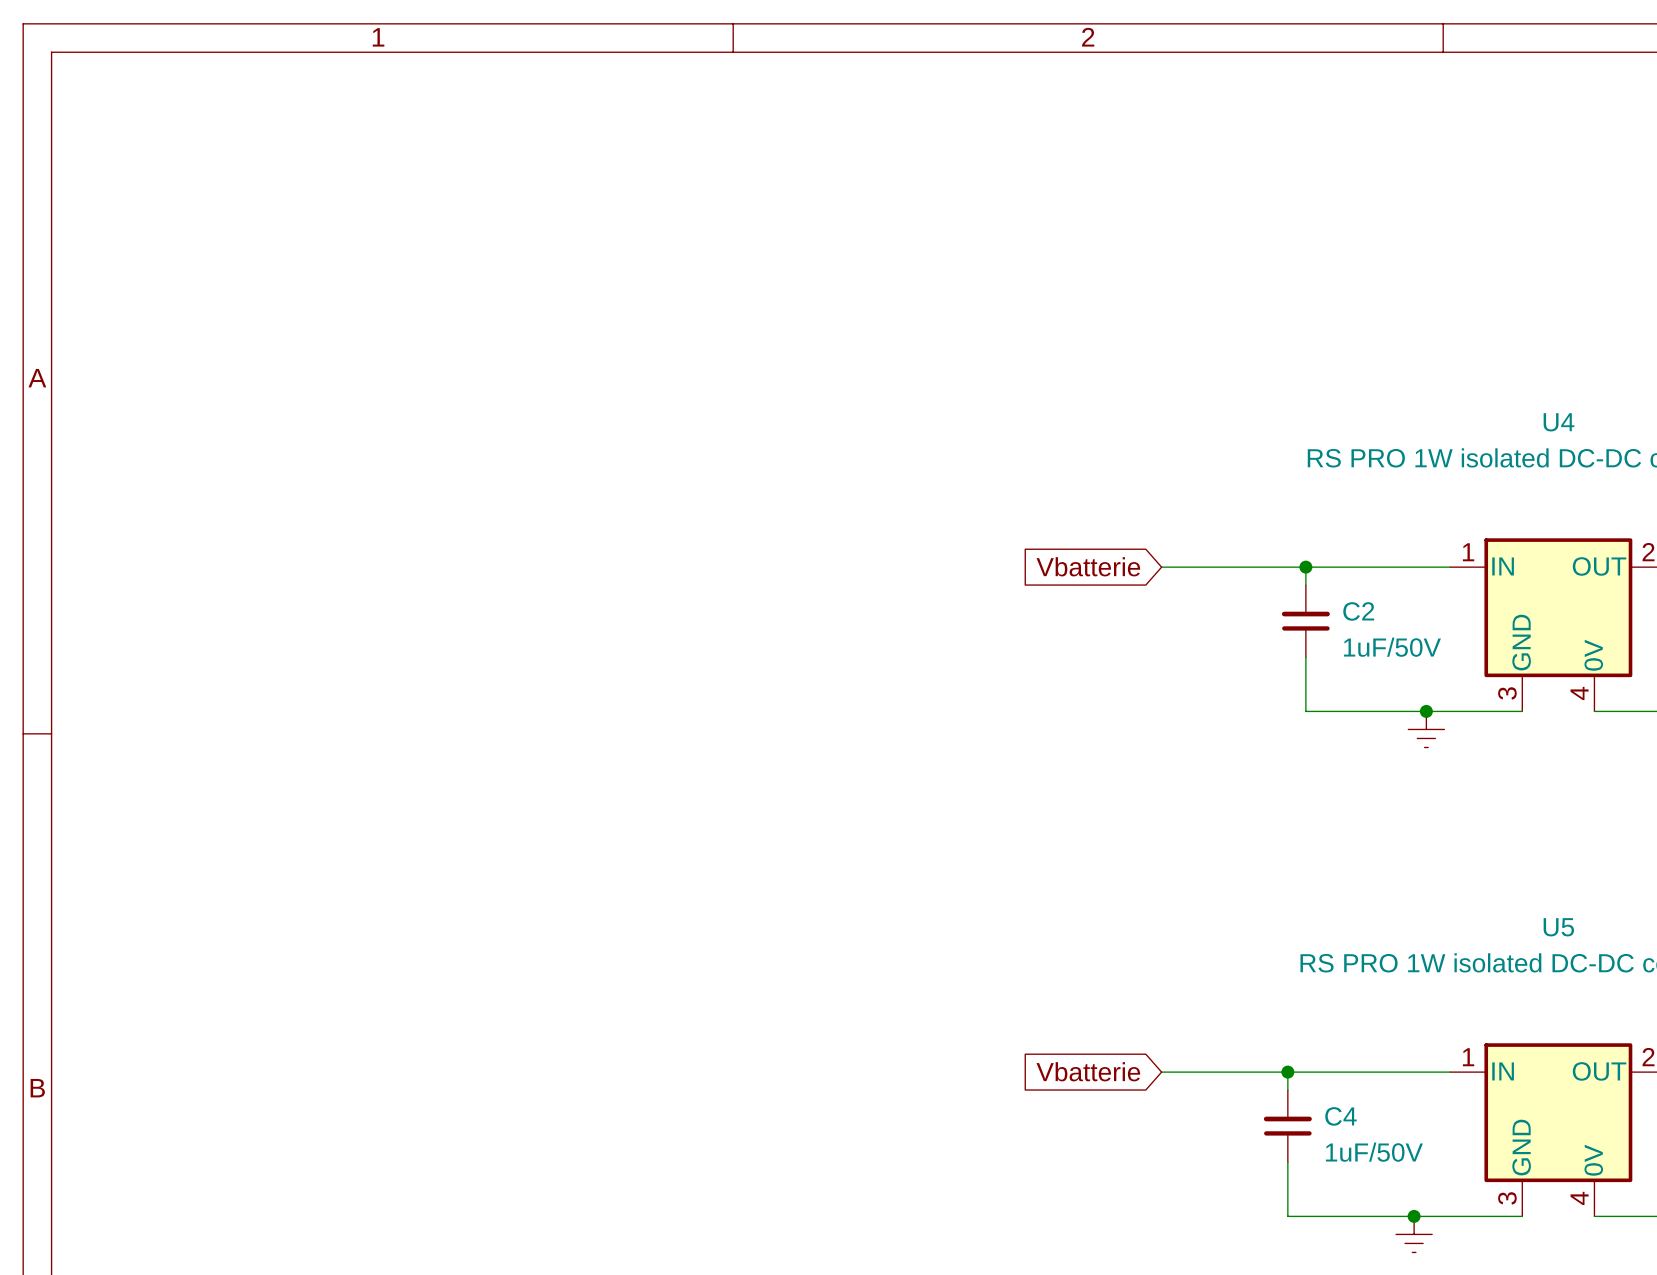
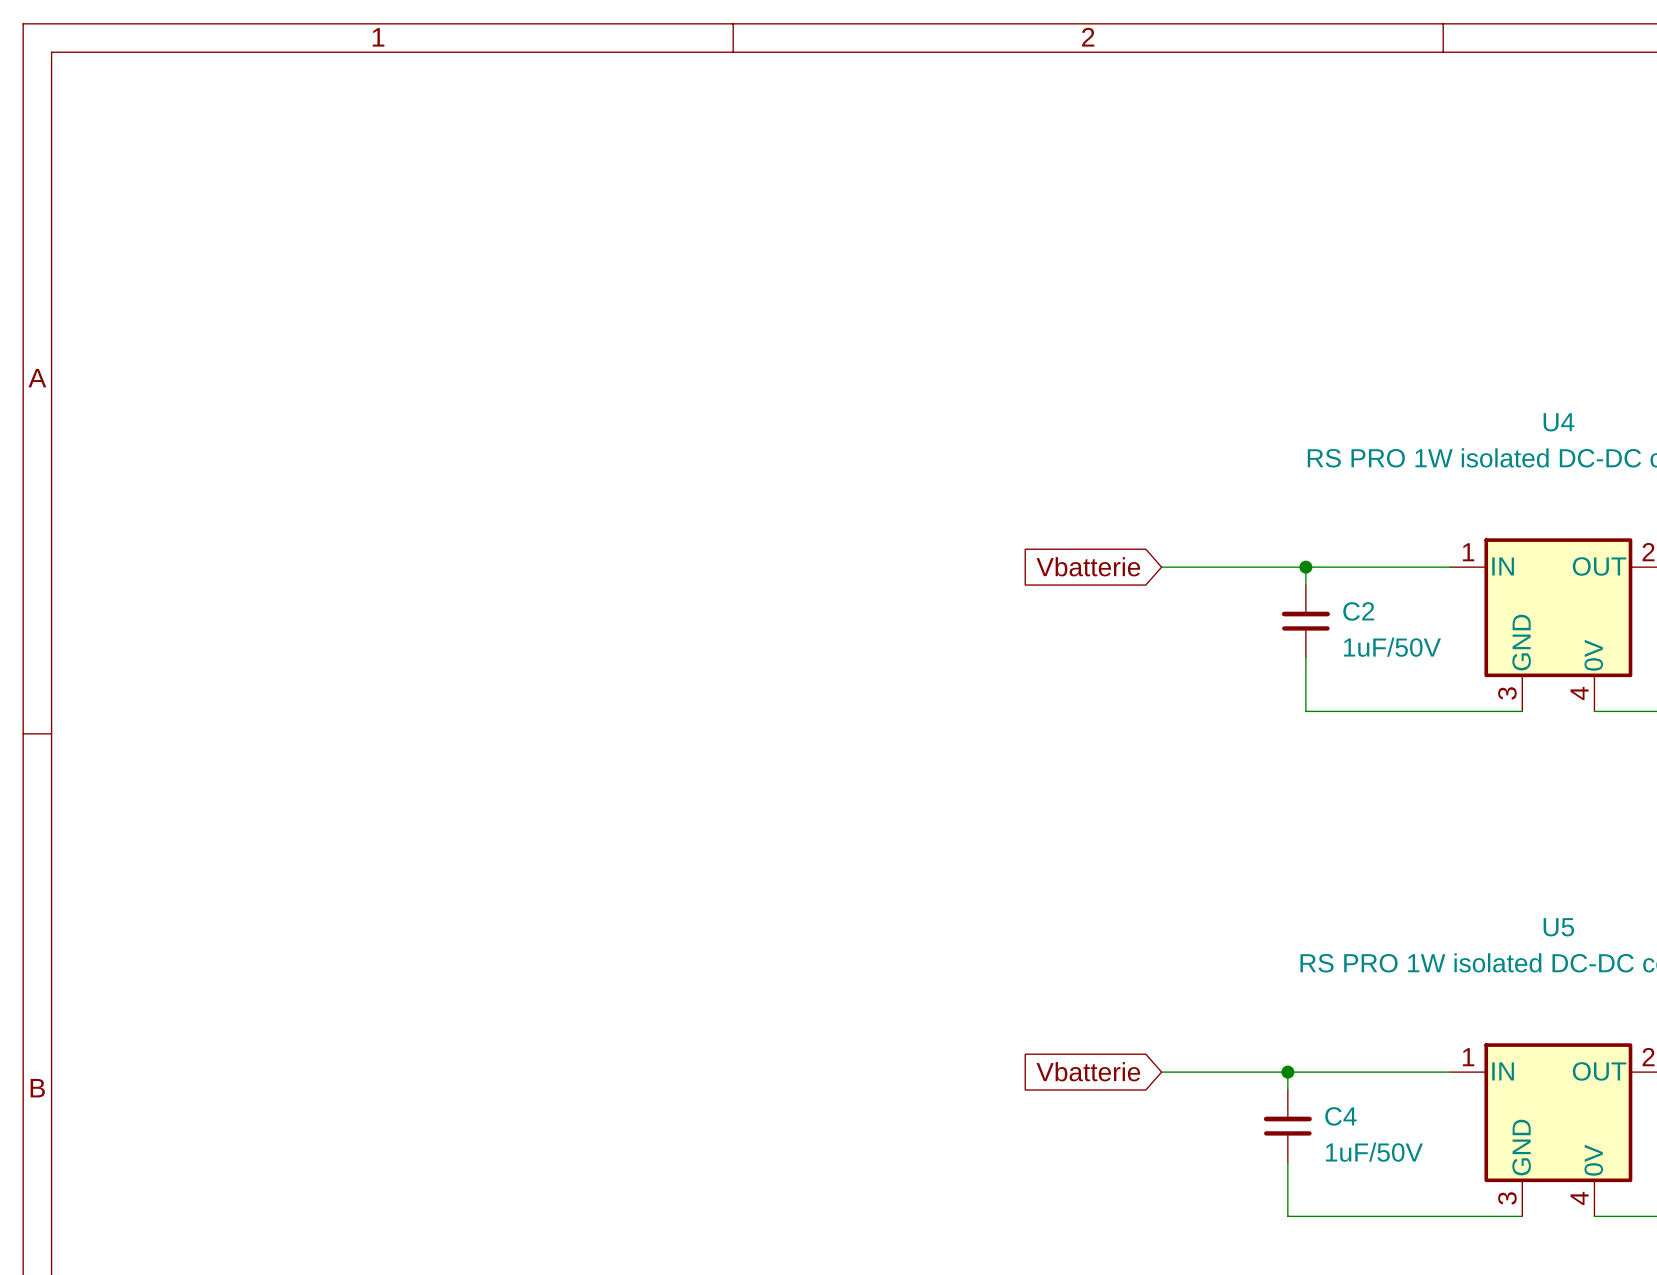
junction: (1426, 711) -> none
power symbol: (1426, 729) -> none
junction: (1414, 1216) -> none
power symbol: (1414, 1234) -> none

